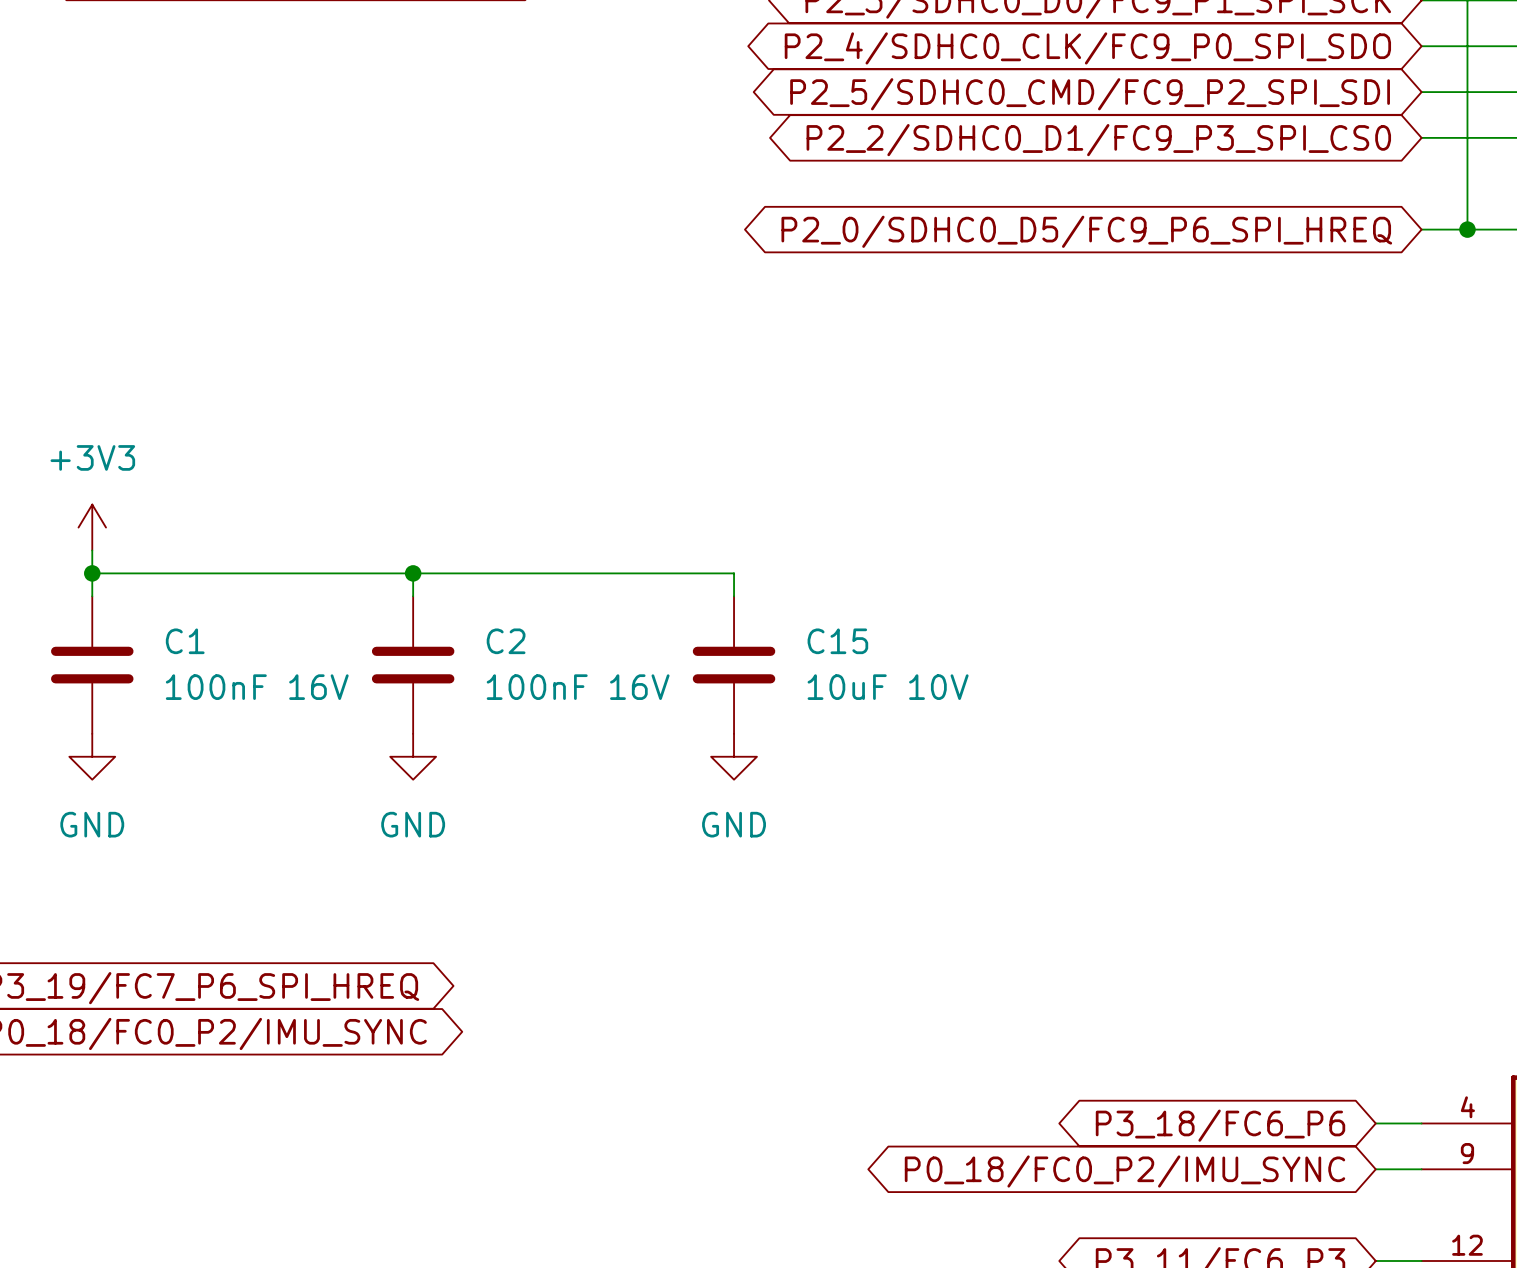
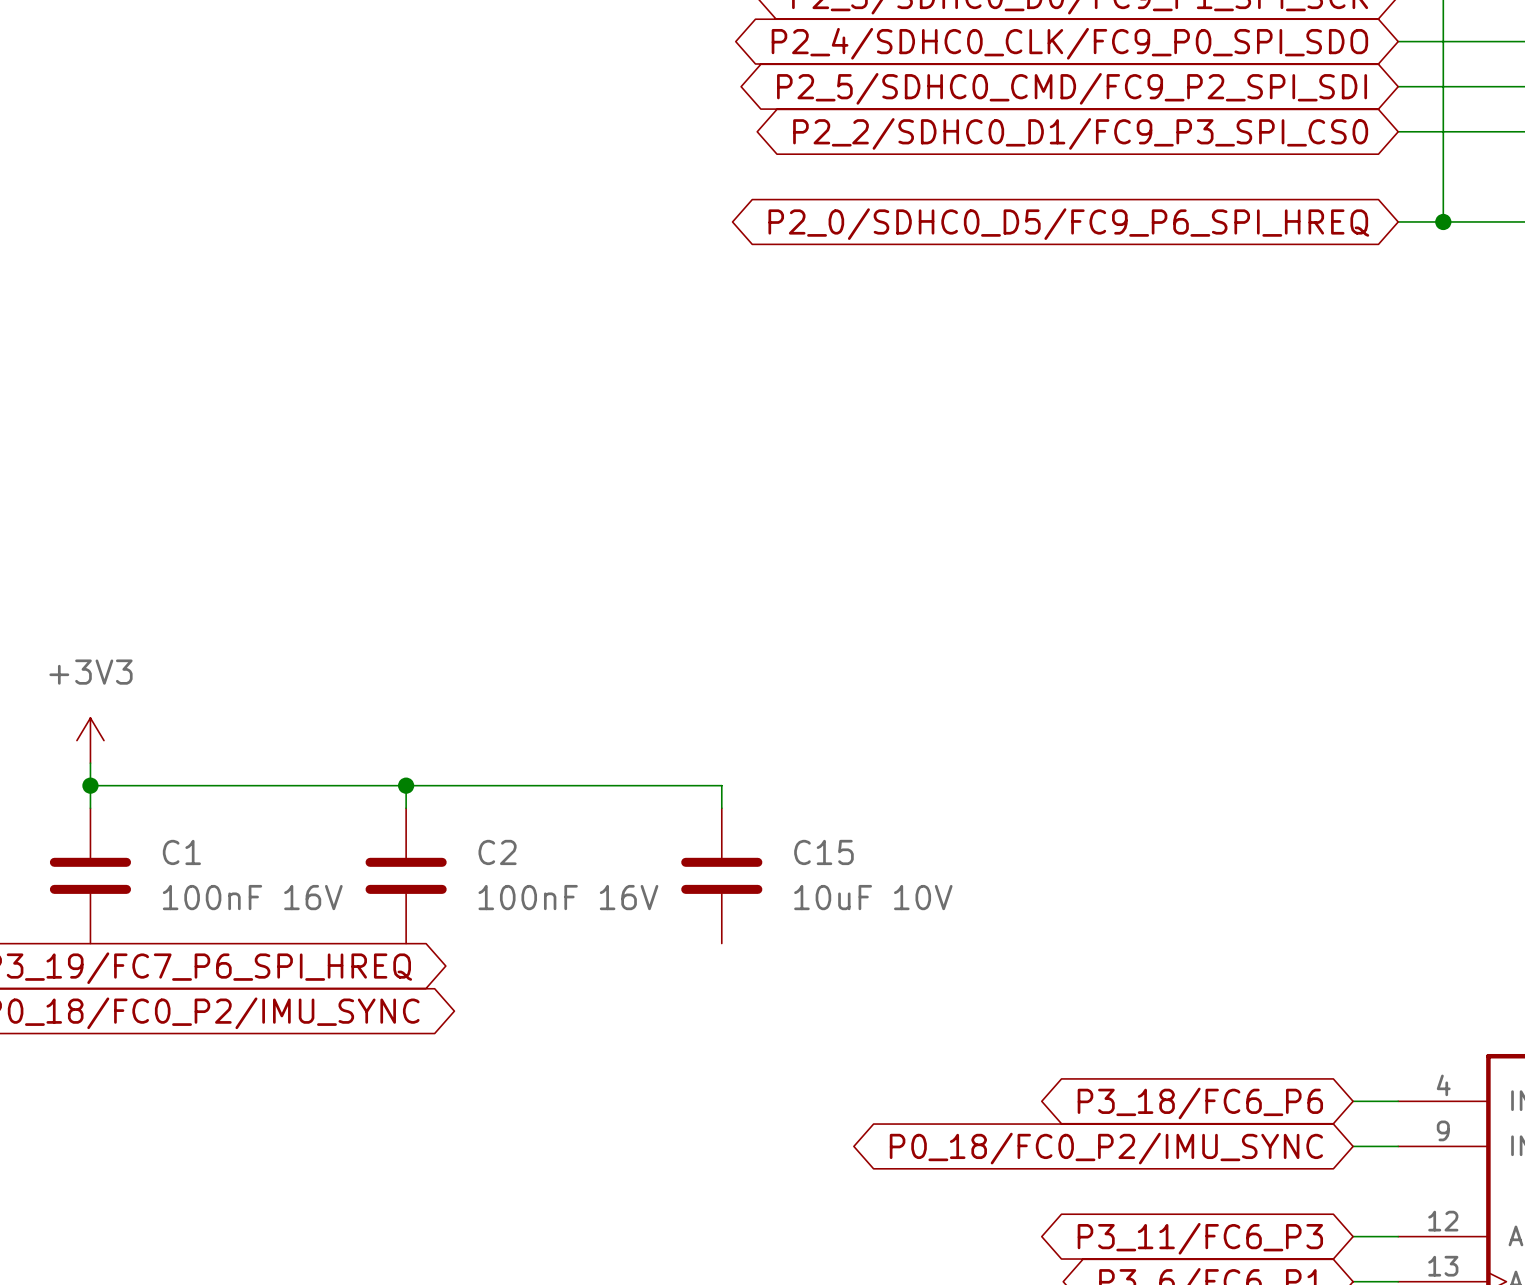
power symbol: +3V3 (92, 527) -> none
wire: (92, 550) (92, 596) -> (90, 763) (90, 808)
wire: (92, 573) (734, 573) (734, 596) -> (90, 785) (721, 785) (721, 808)
junction: (92, 573) -> none
wire: (413, 573) (413, 596) -> (406, 785) (406, 808)
junction: (413, 573) -> none
C1 position: (92, 665) -> (90, 875)
C2 position: (413, 665) -> (406, 875)
C15 position: (734, 665) -> (721, 875)
power symbol: GND (92, 756) -> +3V3 (90, 740)
power symbol: GND (413, 756) -> none
power symbol: GND (734, 756) -> none
junction: none -> (90, 785)
junction: none -> (406, 785)

